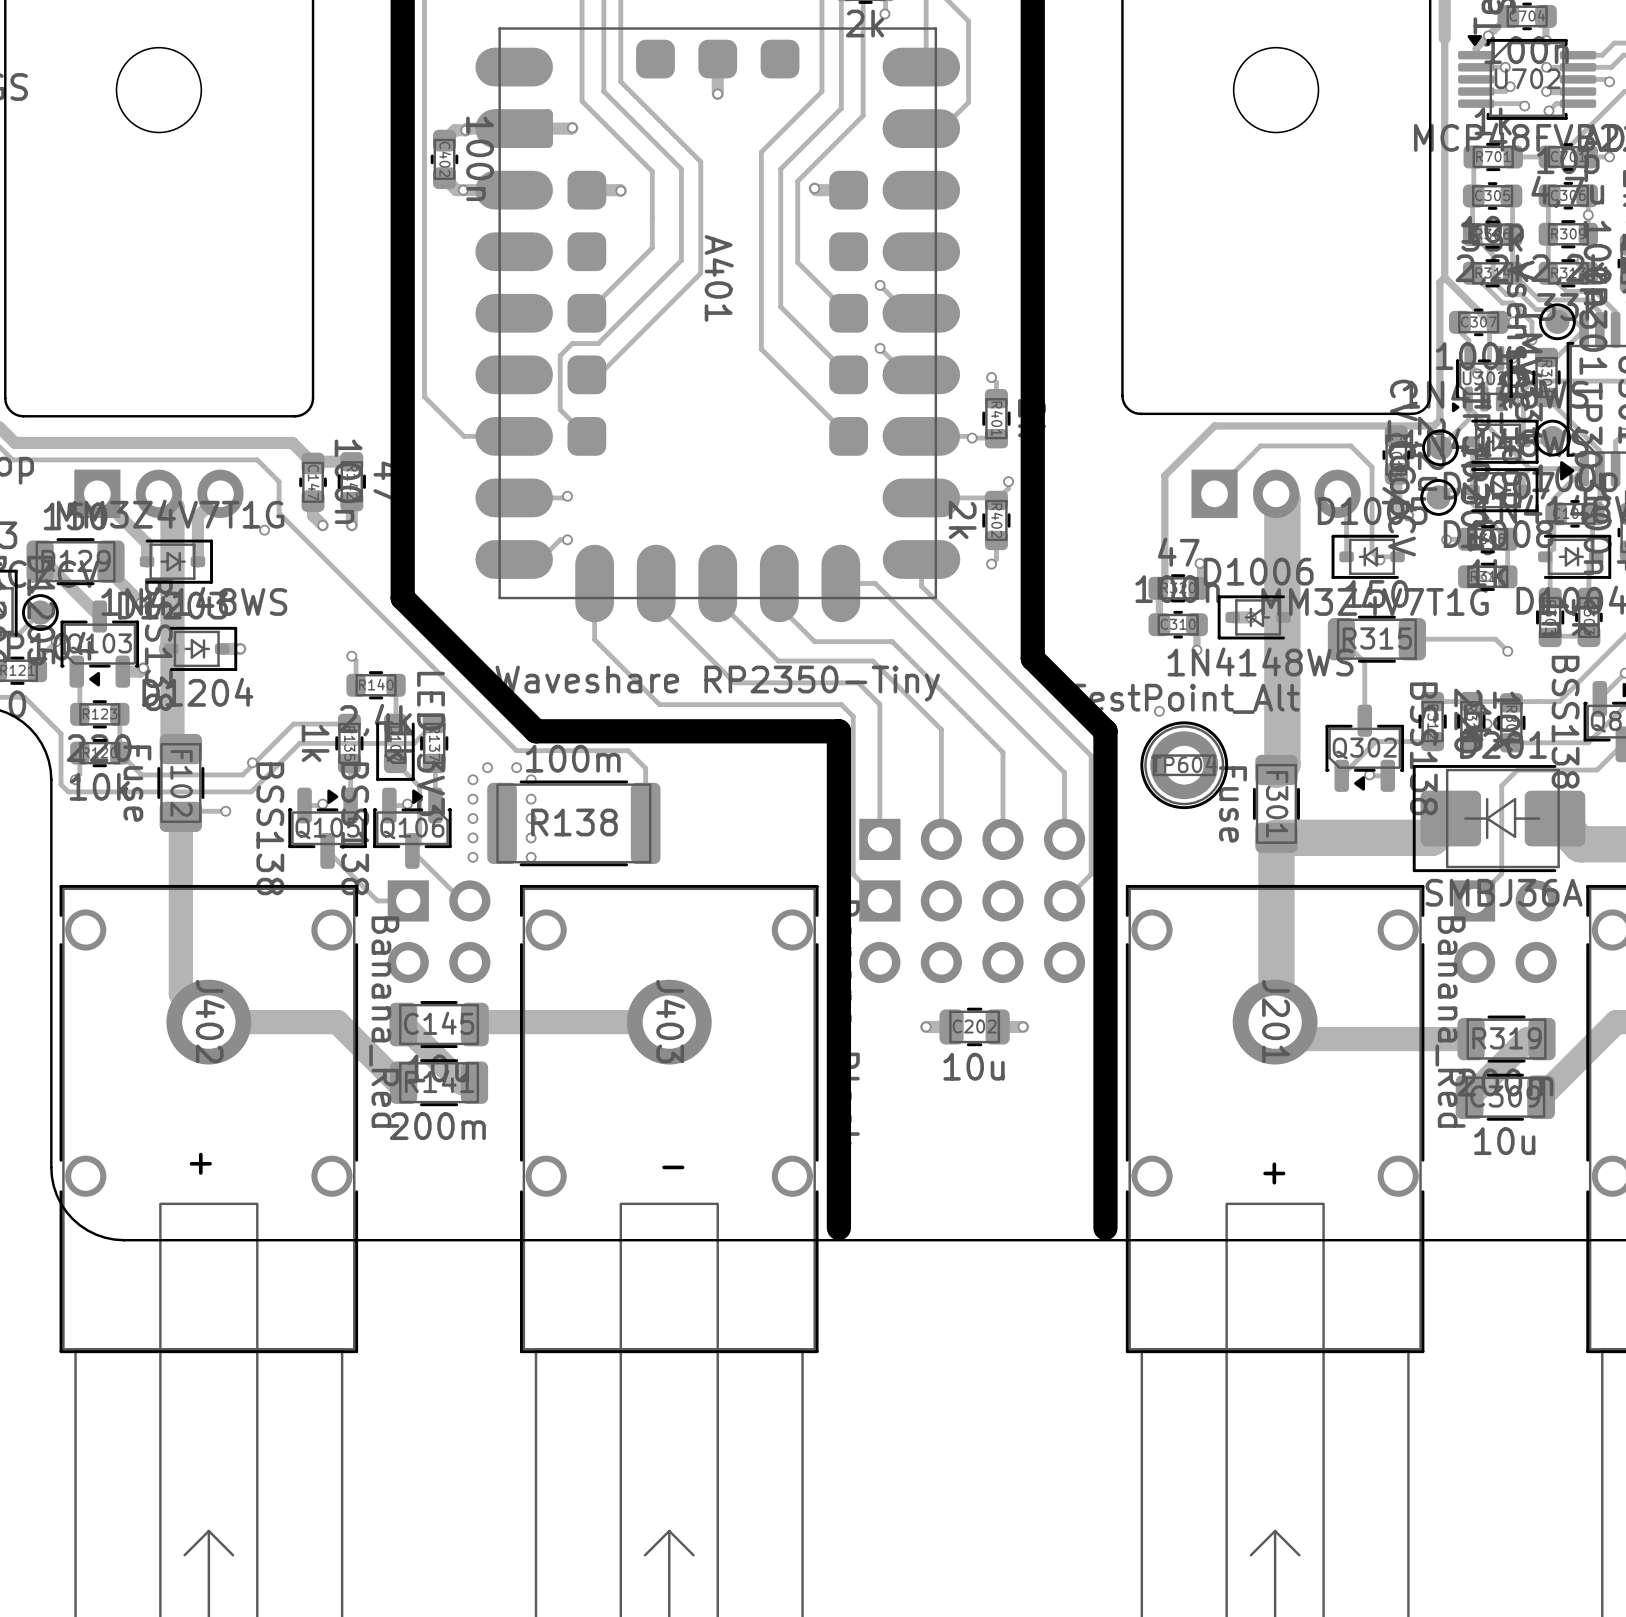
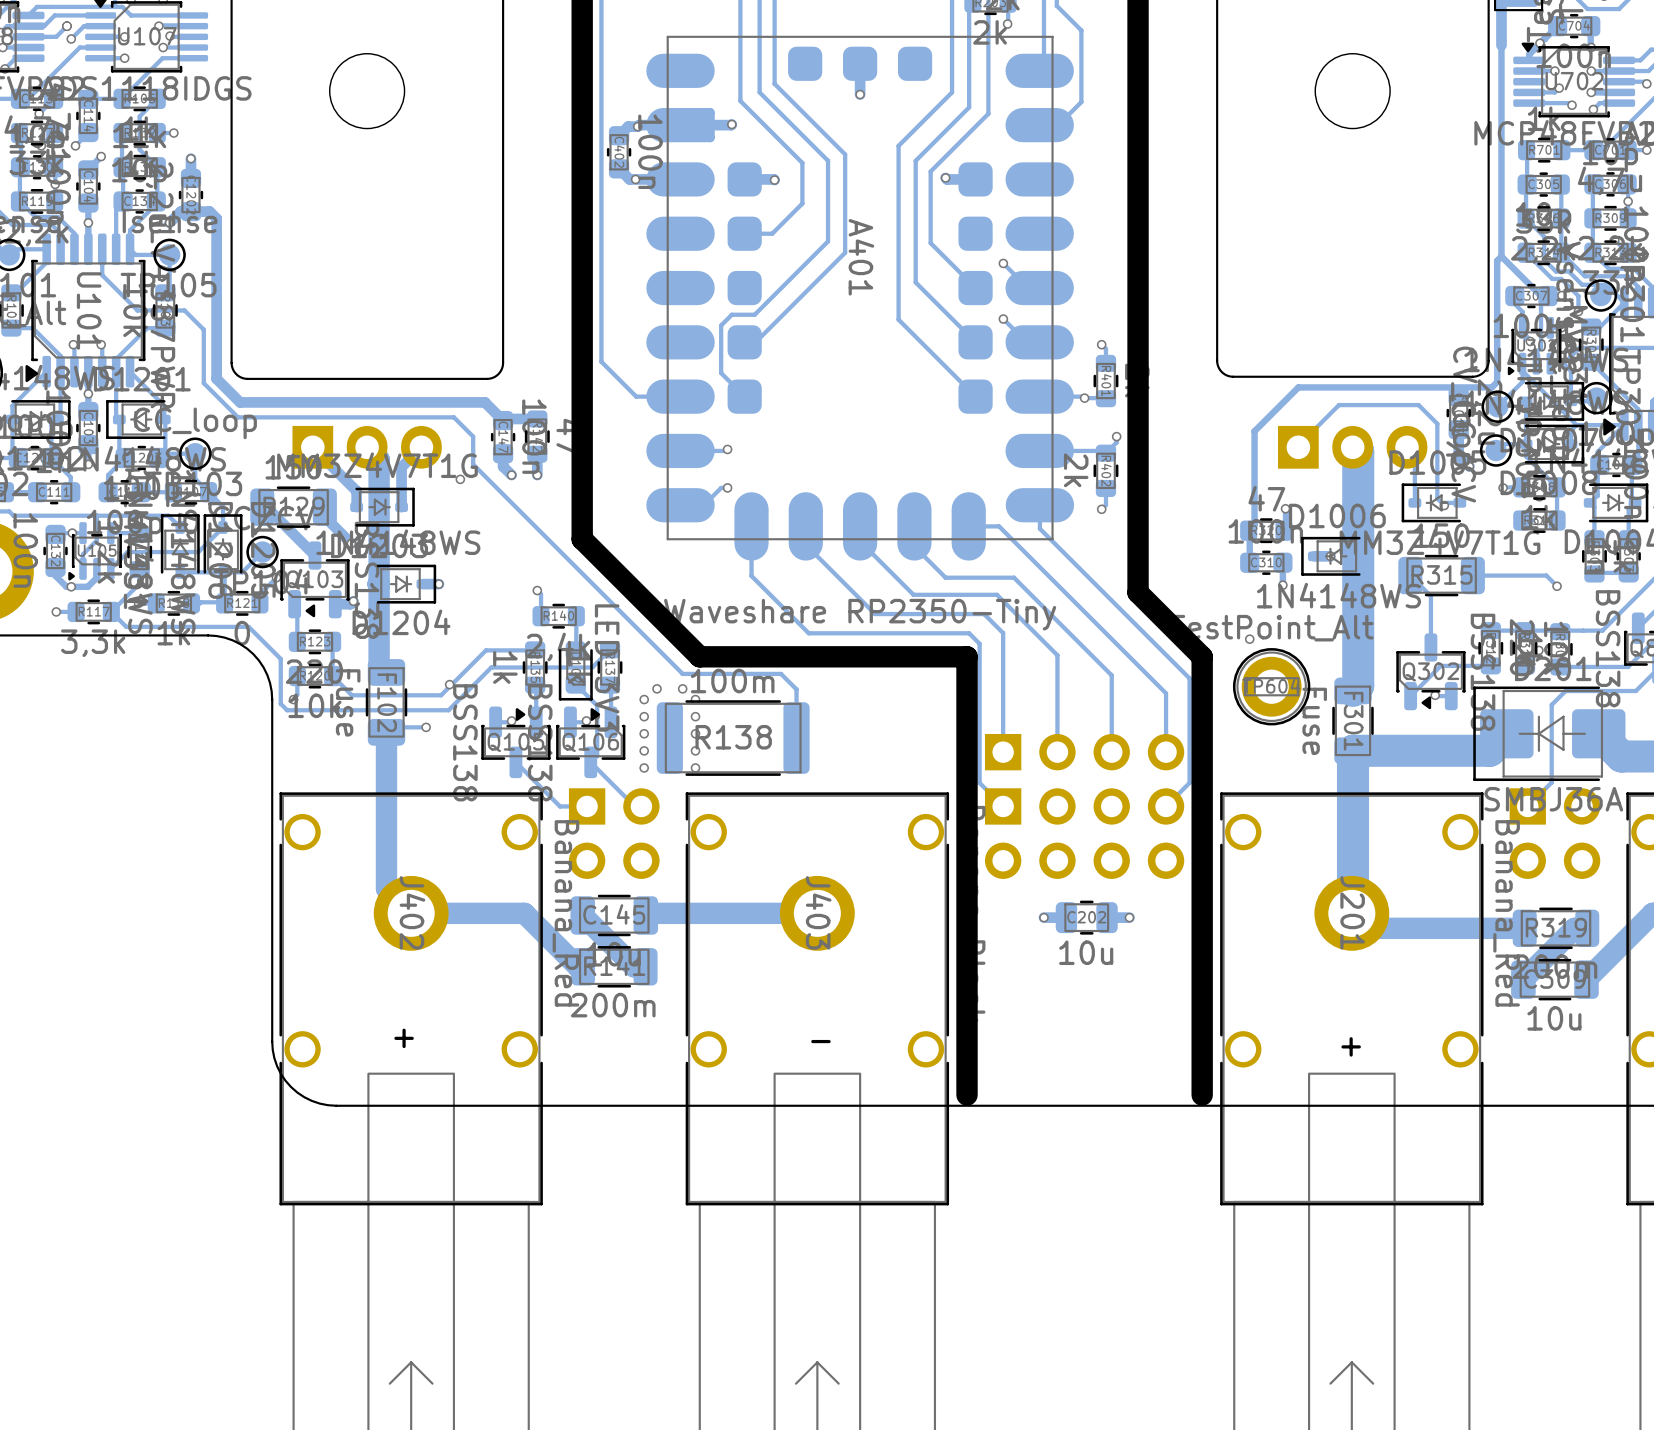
track: (652, 217) (652, 247) (586, 313) -> (802, 203) (772, 233) (744, 233)

